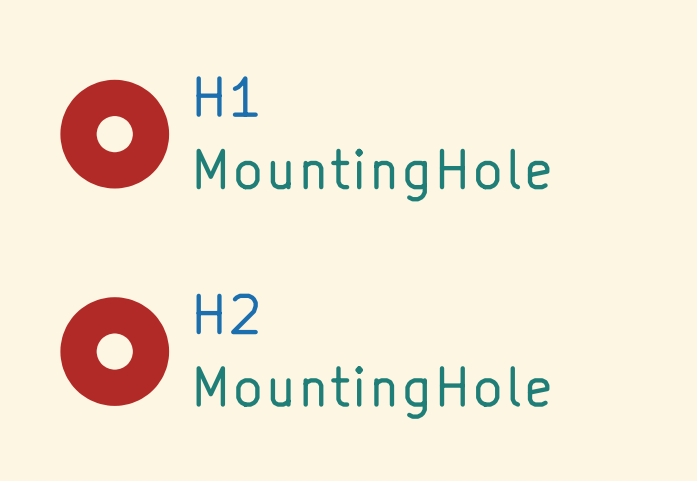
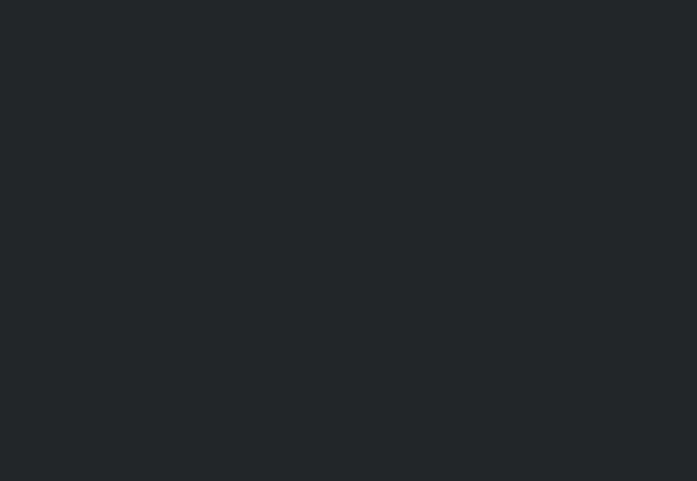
H1: MountingHole (114, 134) -> none
H2: MountingHole (114, 351) -> none

